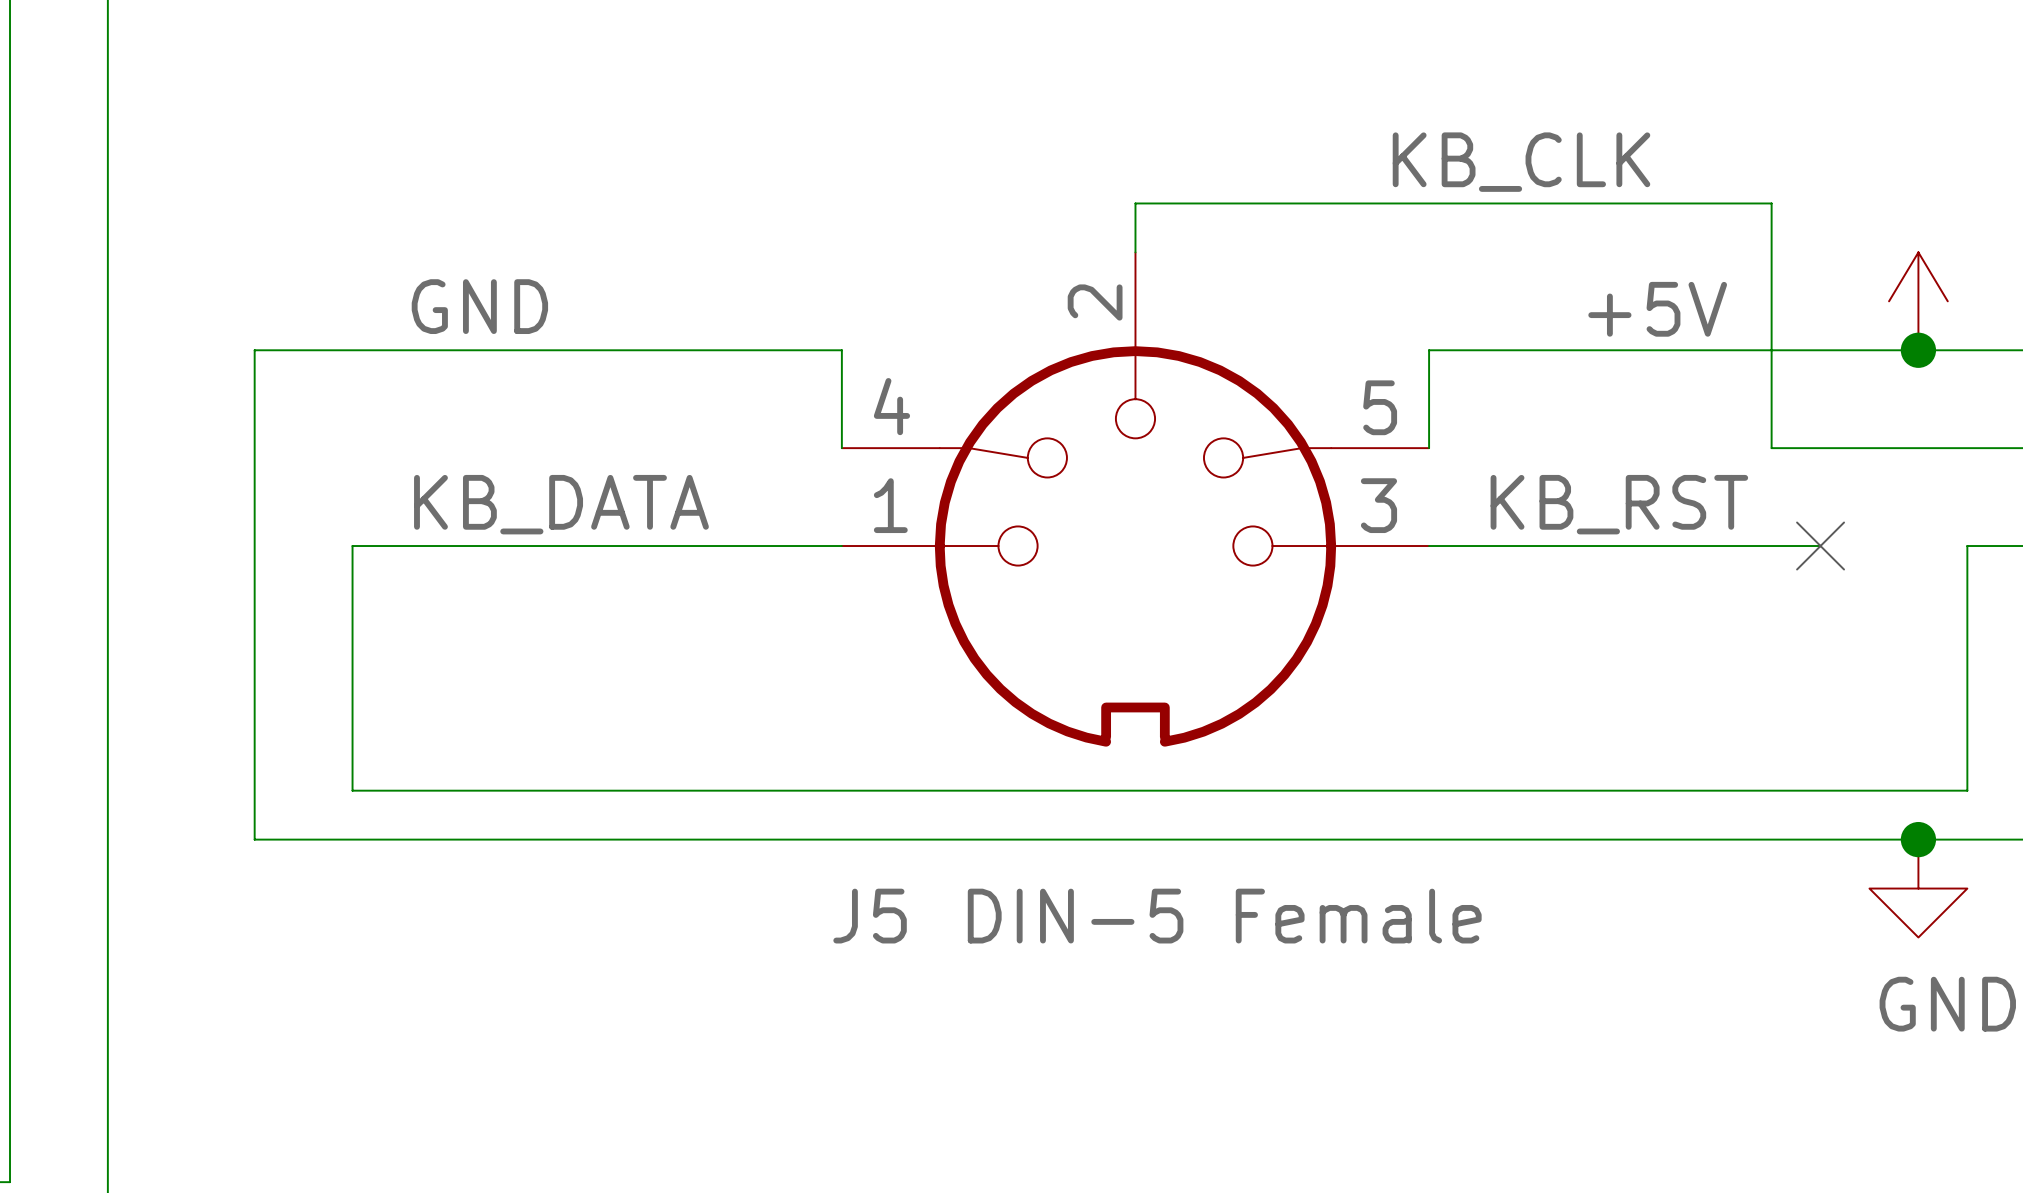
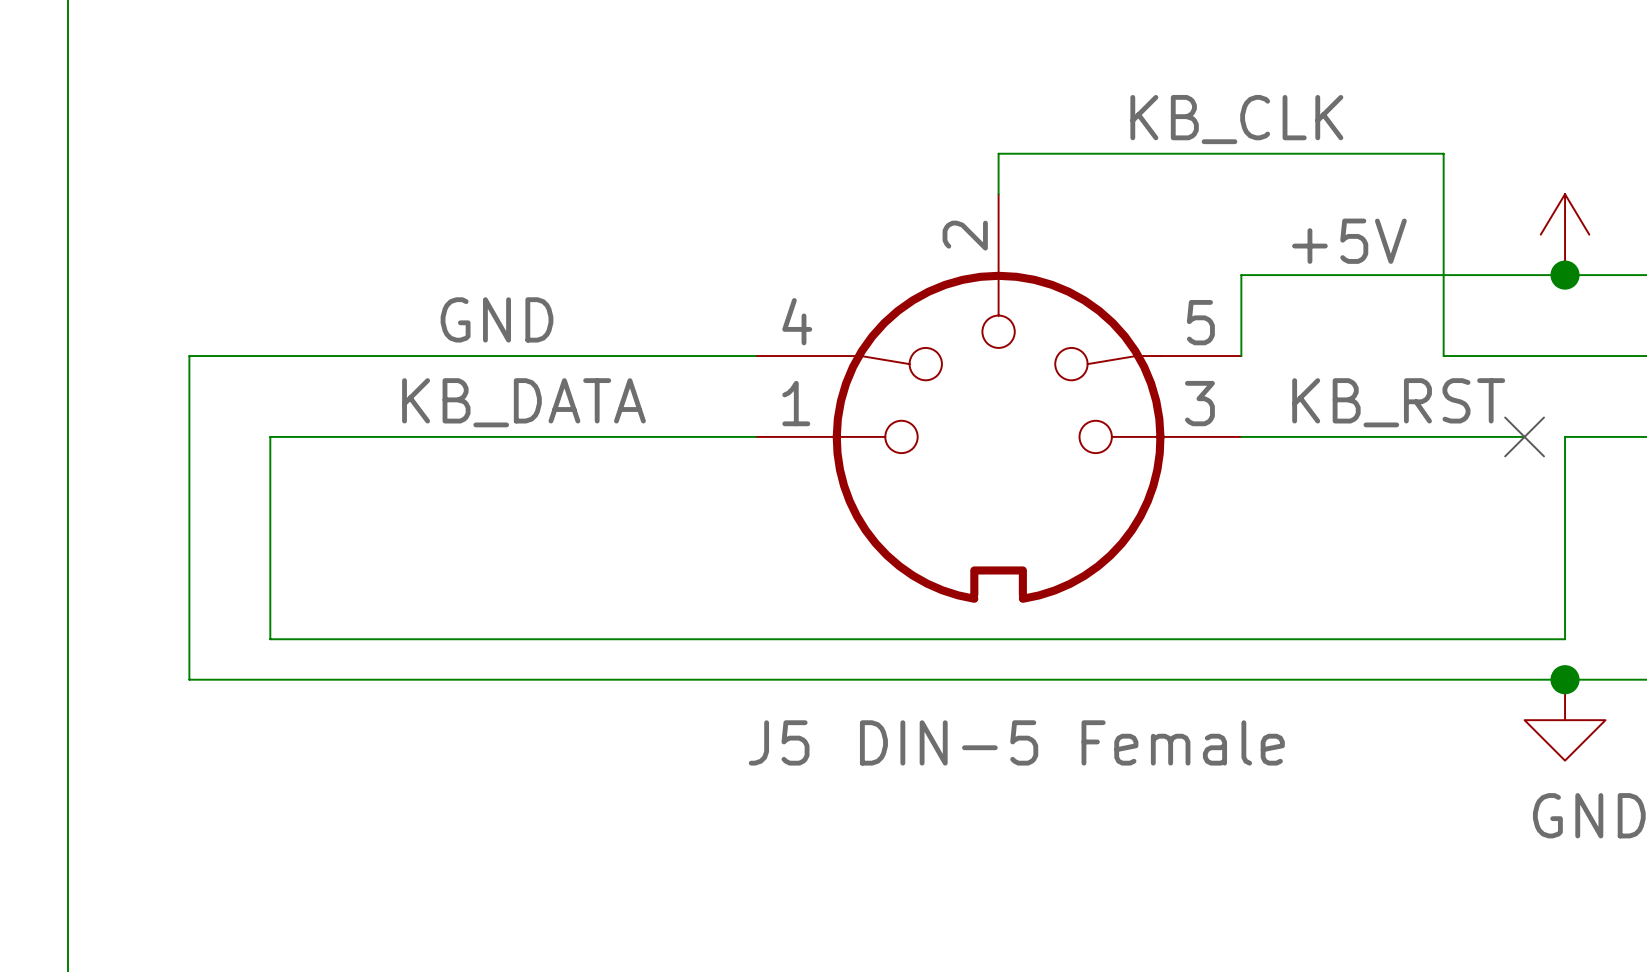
wire: (1233, 203) (1135, 203) (1135, 252) -> (998, 153) (998, 194)
label position: GND (479, 306) -> GND (497, 319)
wire: (1526, 350) (1429, 350) (1429, 448) -> (1241, 275) (1241, 356)
wire: (254, 448) (254, 350) (841, 350) (841, 448) -> (189, 356) (755, 356)
J5 position: (1135, 499) -> (998, 398)
label position: KB_DATA (561, 504) -> KB_DATA (523, 402)
label position: KB_RST (1619, 504) -> KB_RST (1398, 402)
wire: none -> (1484, 436) (1524, 436)
no-connect mark position: (1820, 546) -> (1524, 436)
wire: (1967, 546) (1967, 790) (1918, 790) -> (1605, 436) (1565, 436) (1565, 639)

